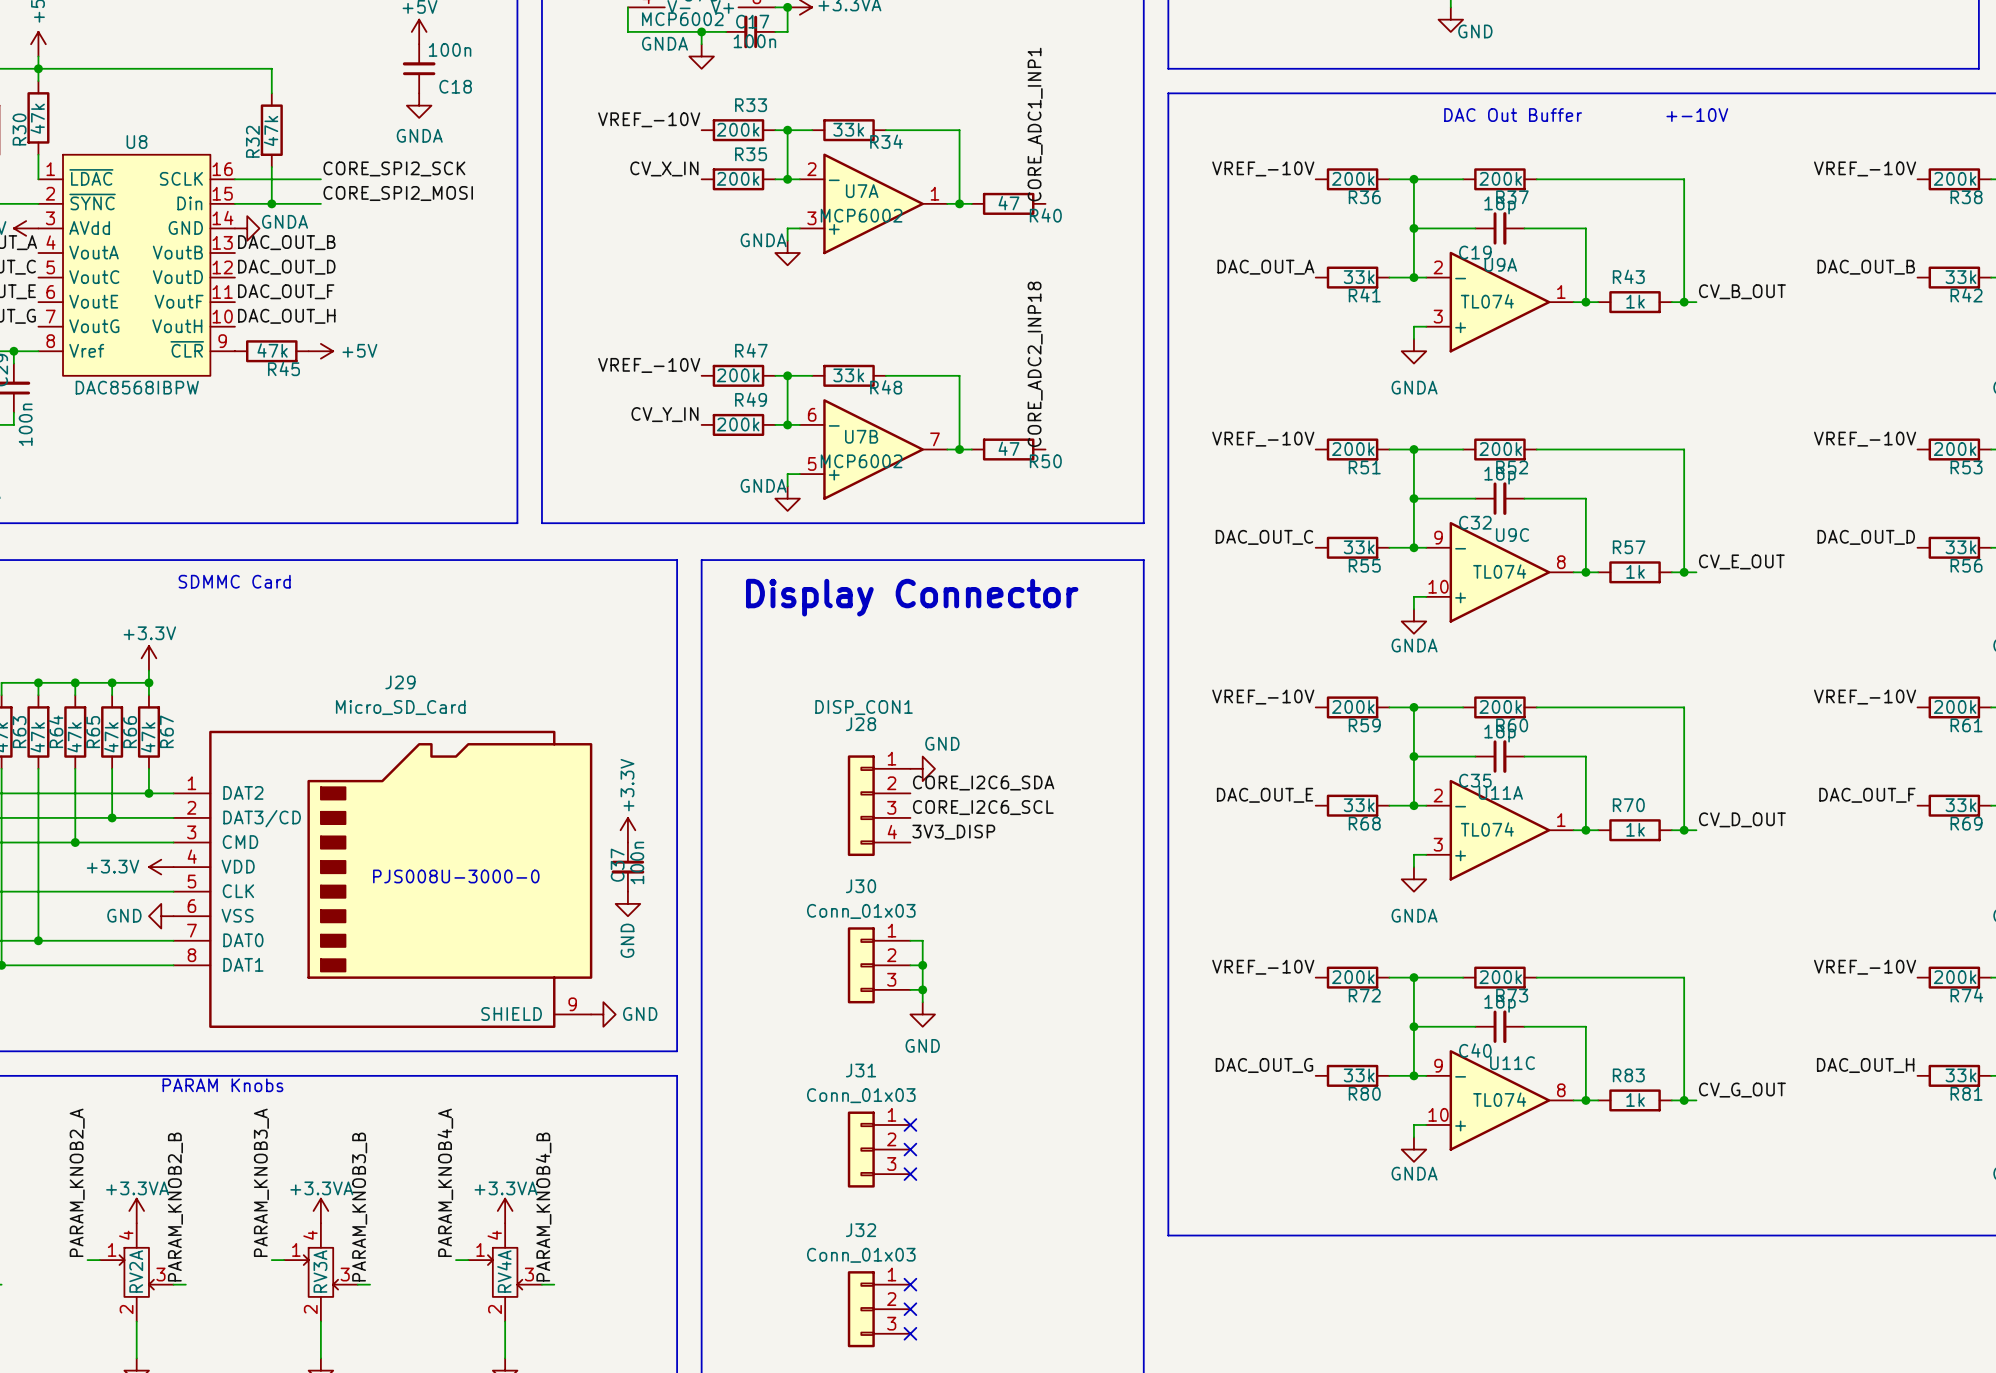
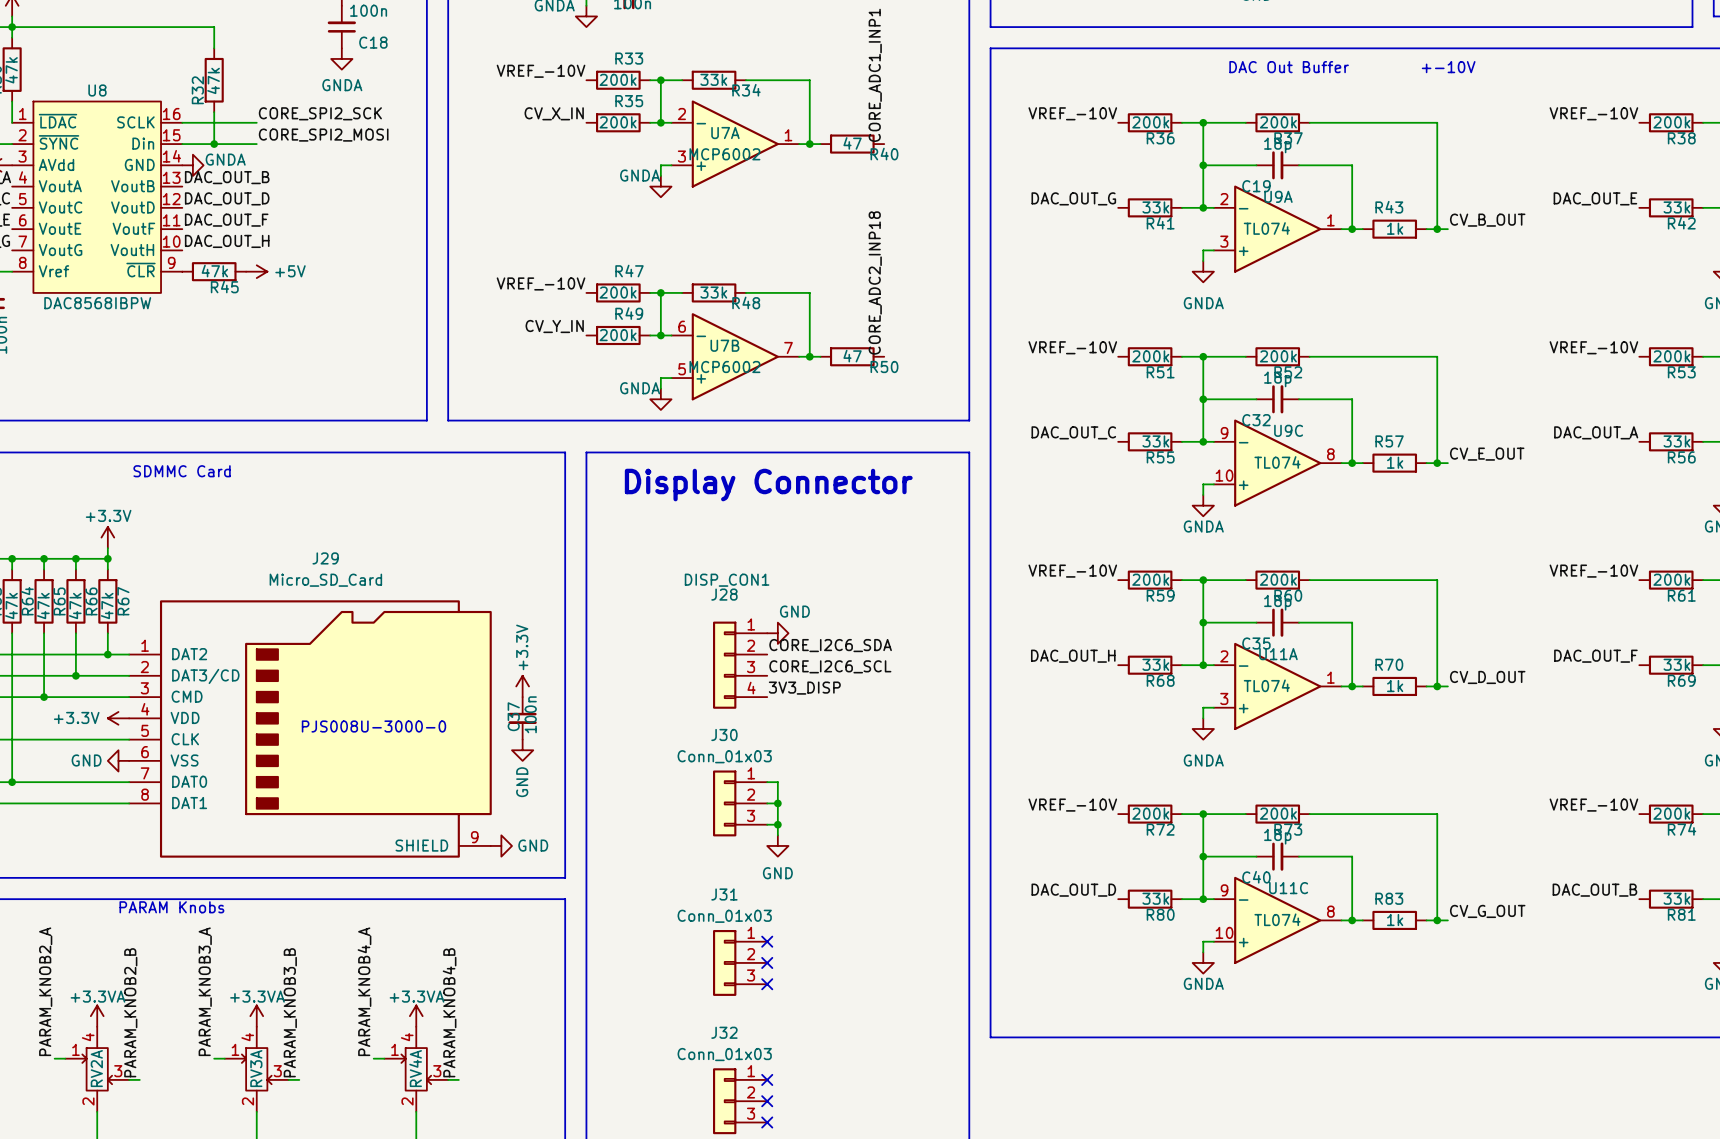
label: DAC_OUT_A (1265, 267) -> DAC_OUT_G (1073, 198)
label: DAC_OUT_B (1866, 267) -> DAC_OUT_E (1595, 198)
label: DAC_OUT_D (1866, 537) -> DAC_OUT_A (1596, 432)
label: DAC_OUT_E (1265, 795) -> DAC_OUT_H (1073, 656)
label: DAC_OUT_G (1264, 1065) -> DAC_OUT_D (1073, 890)
label: DAC_OUT_H (1865, 1065) -> DAC_OUT_B (1594, 890)

